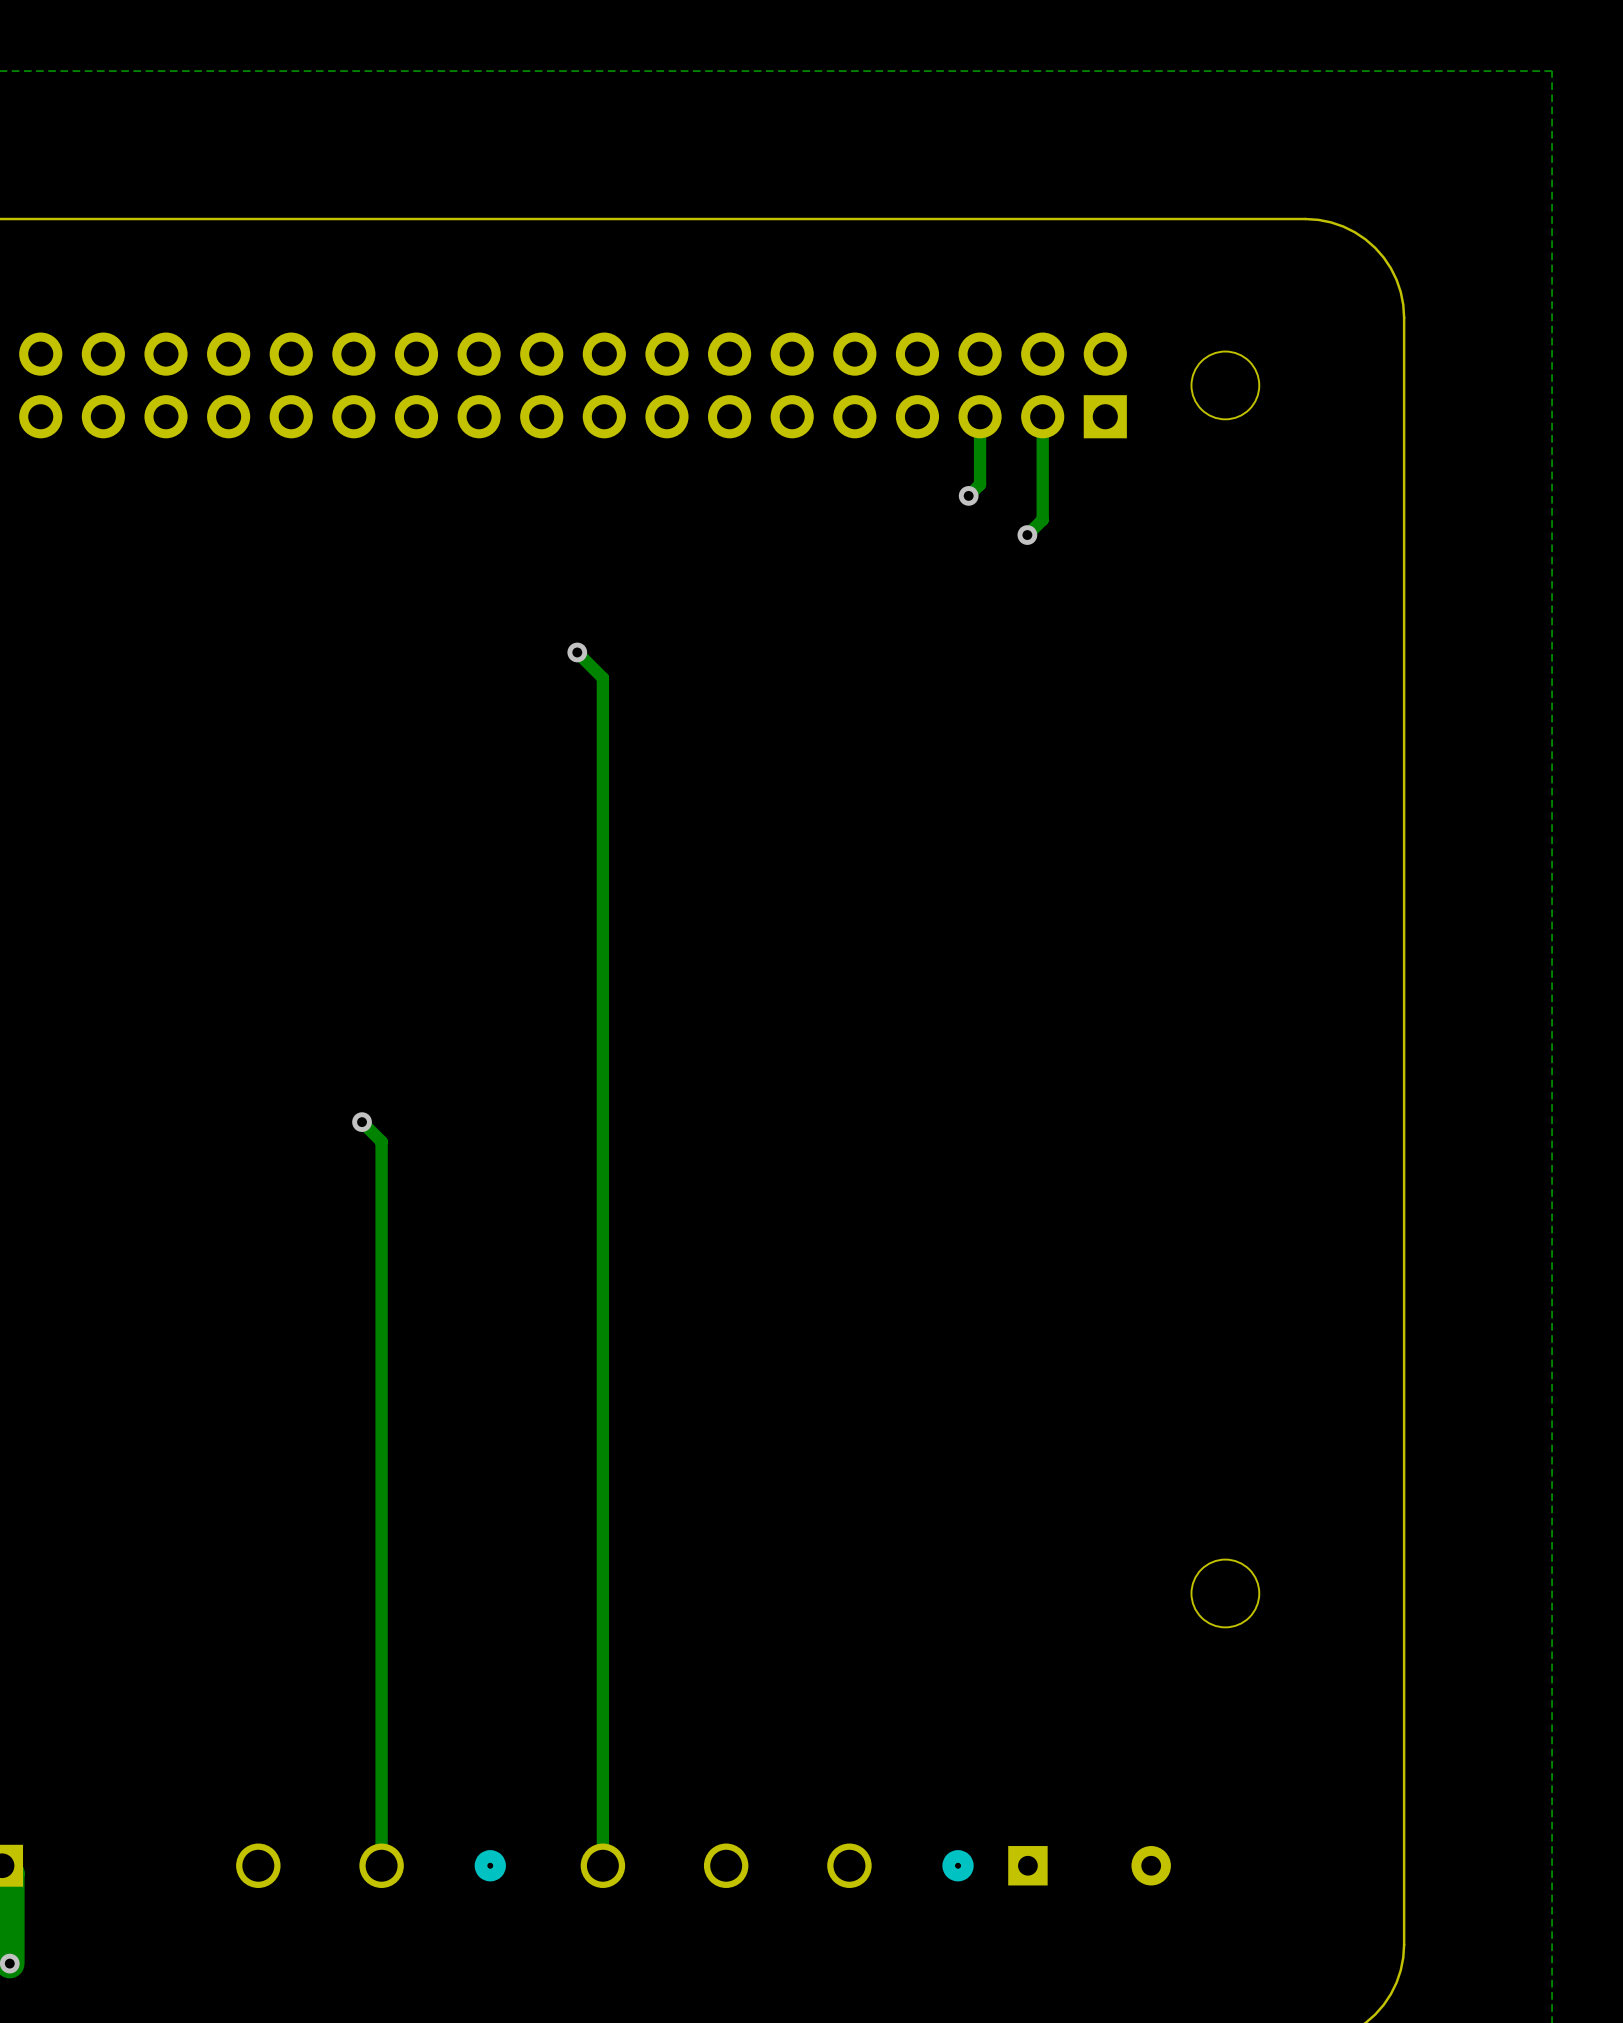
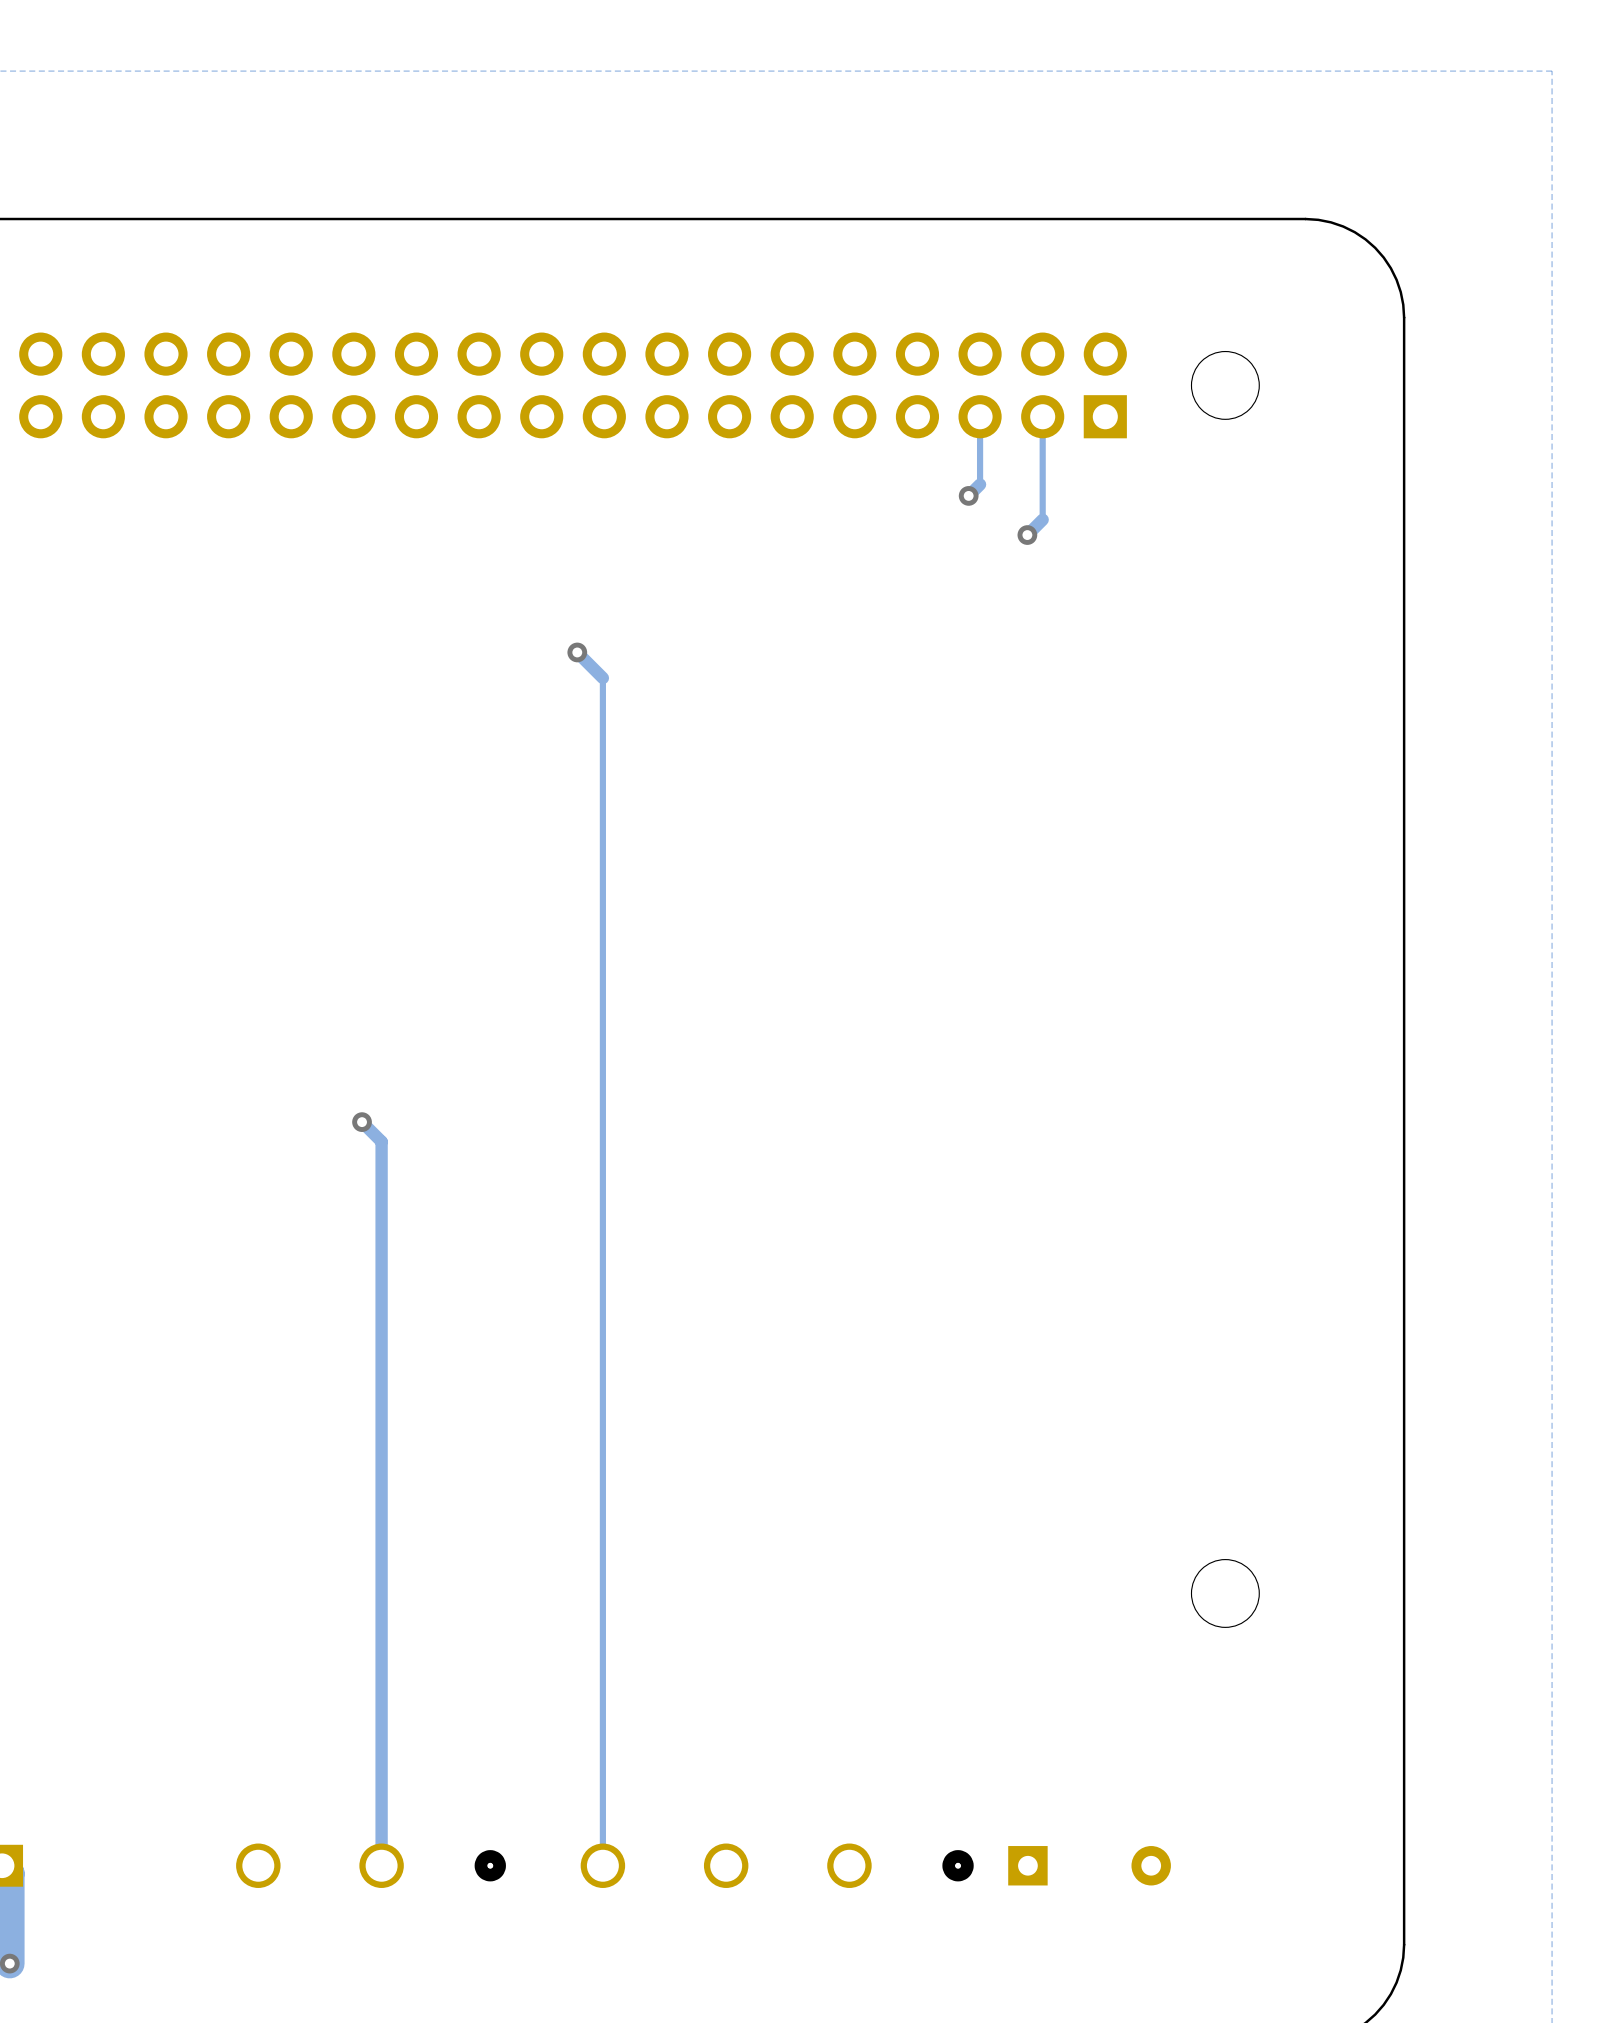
track width: thick (980, 416) (980, 484) -> thin (980, 416) (980, 484)
track width: thick (1042, 416) (1042, 519) -> thin (1042, 416) (1042, 519)
track width: thick (602, 678) (602, 1865) -> thin (602, 678) (602, 1865)

